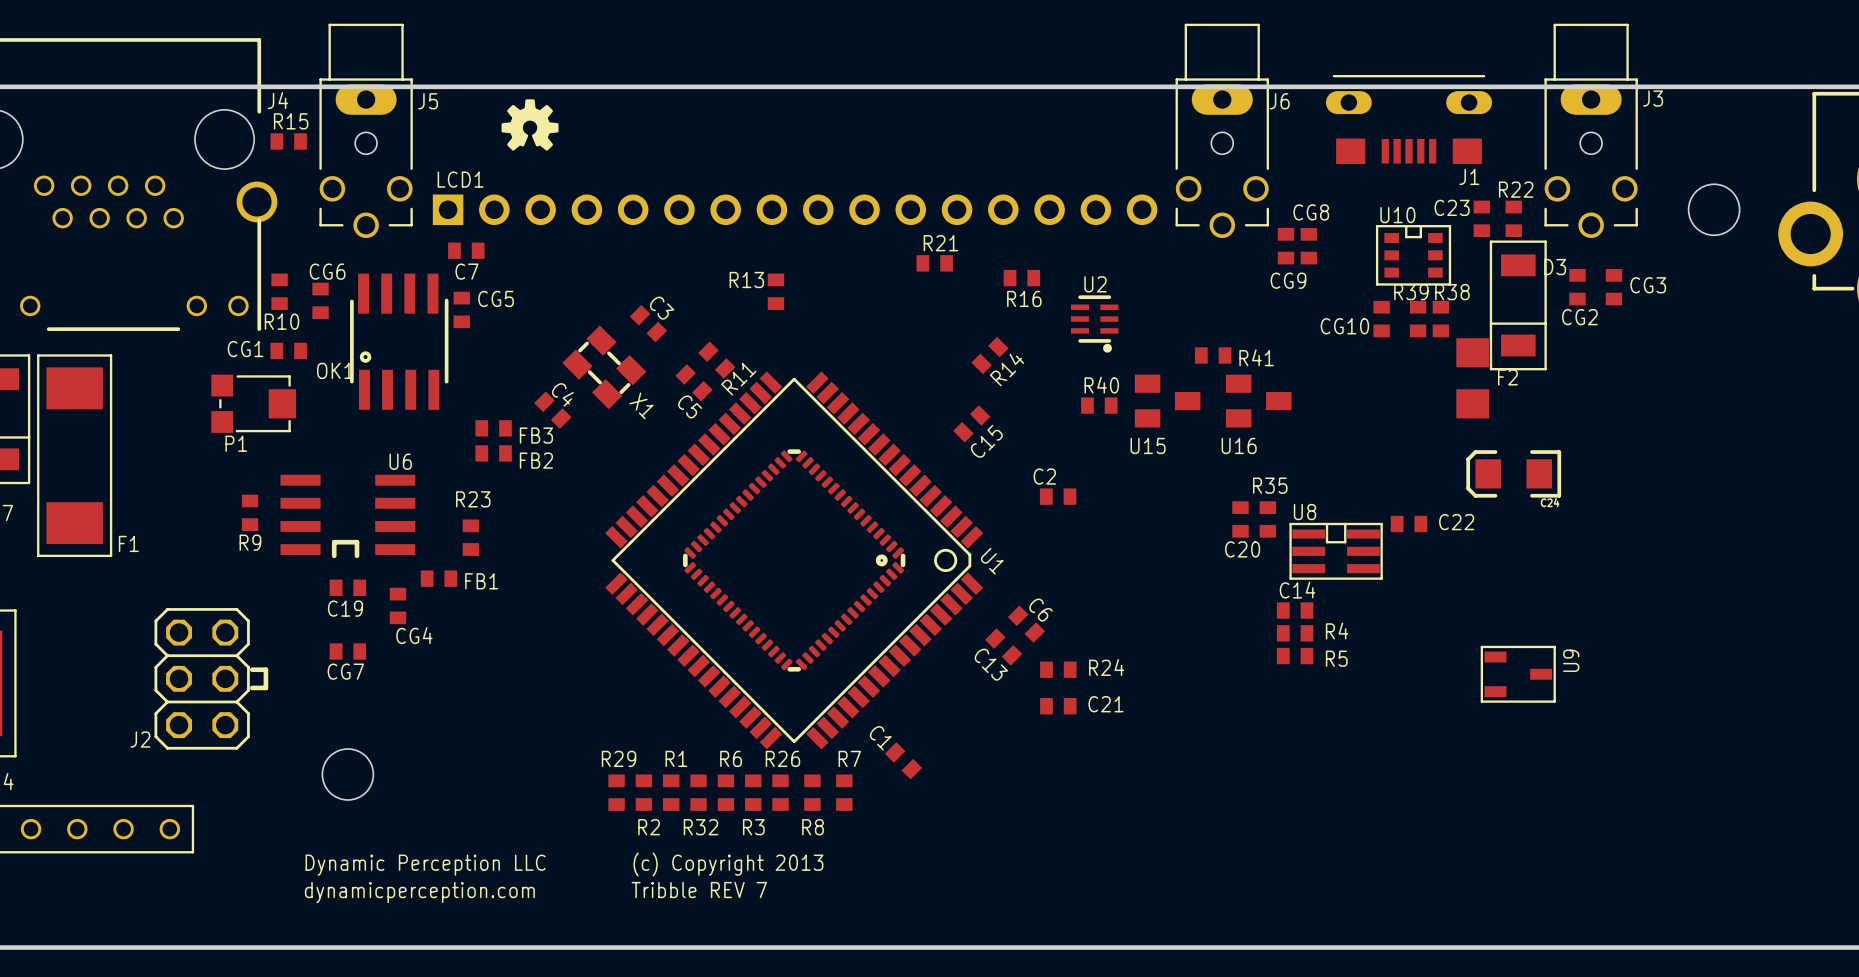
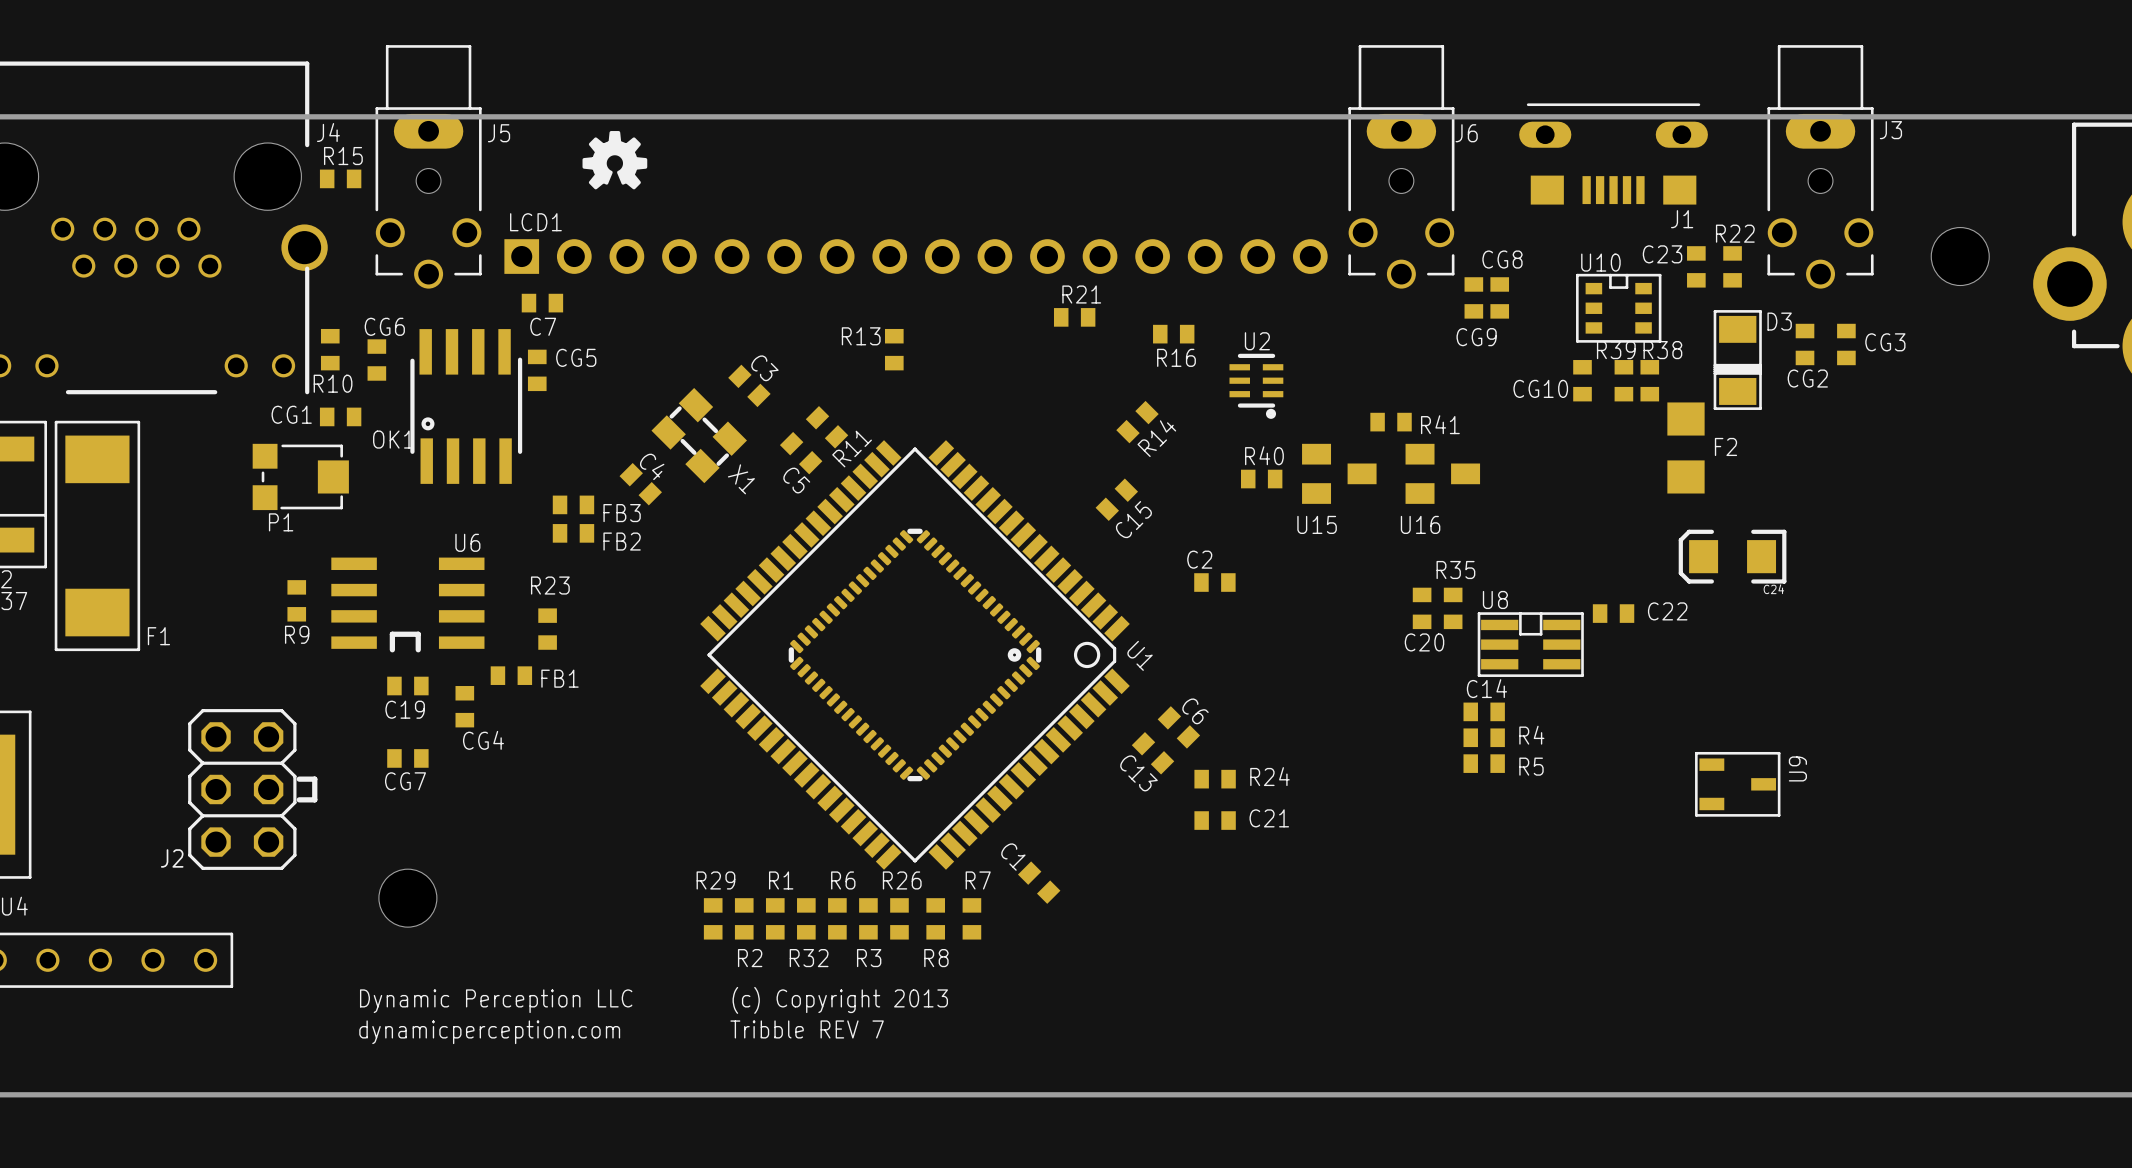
D3 footprint: [1489, 240, 1547, 371] -> [1713, 310, 1762, 410]

